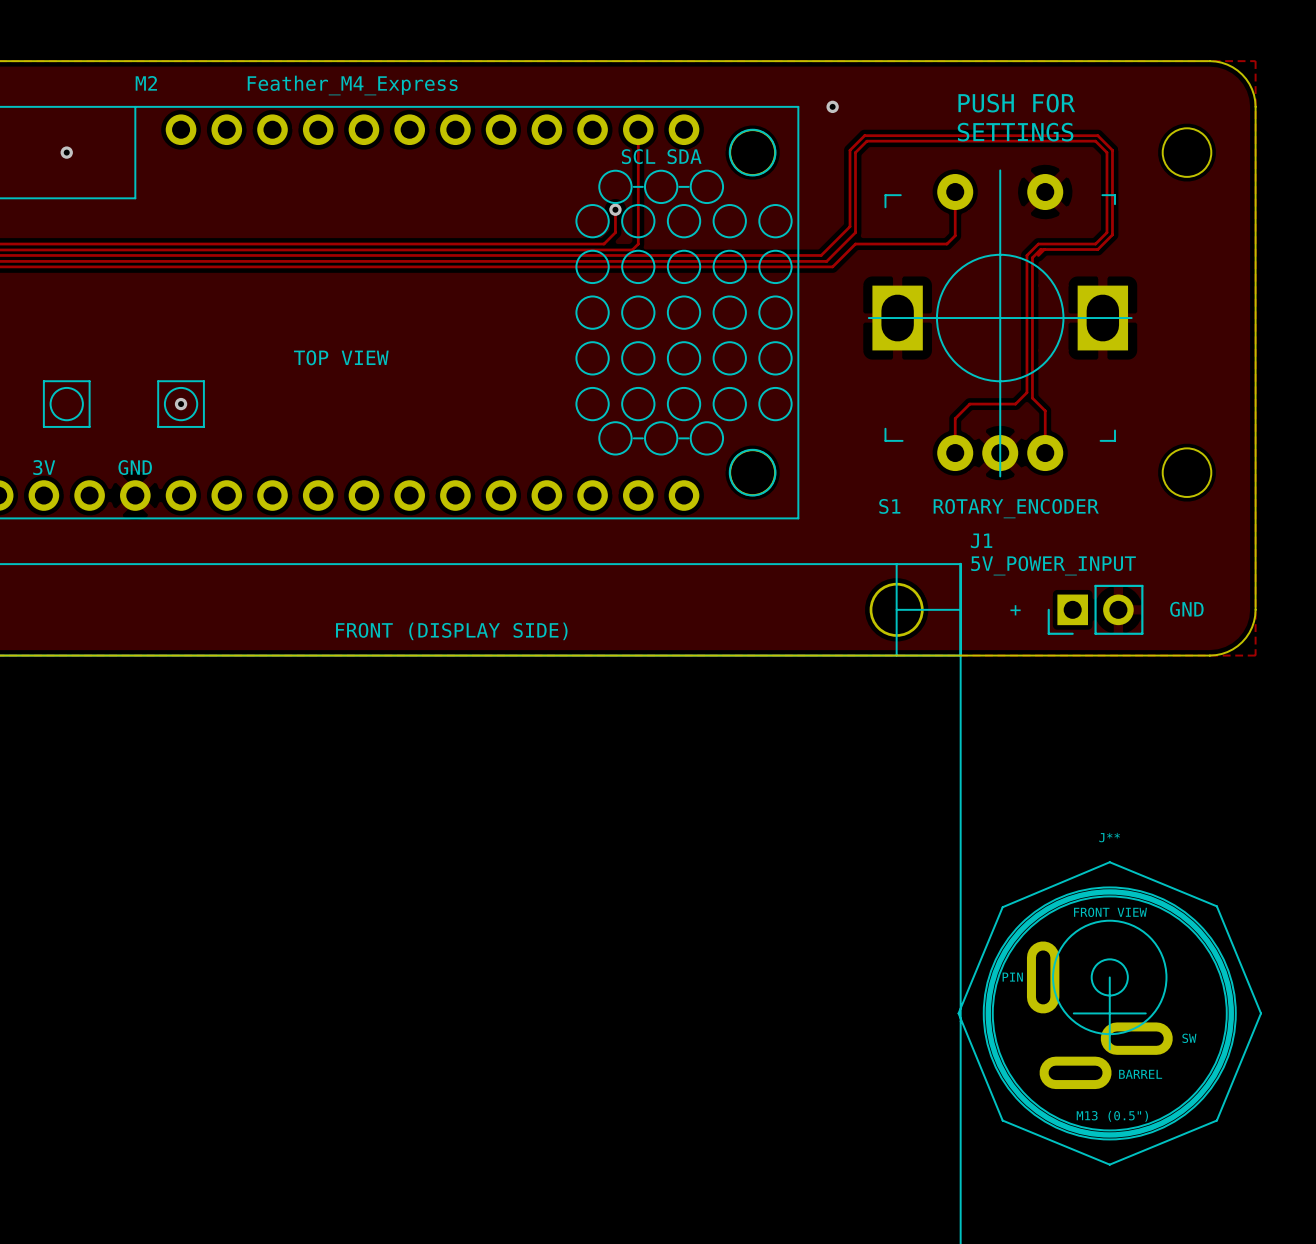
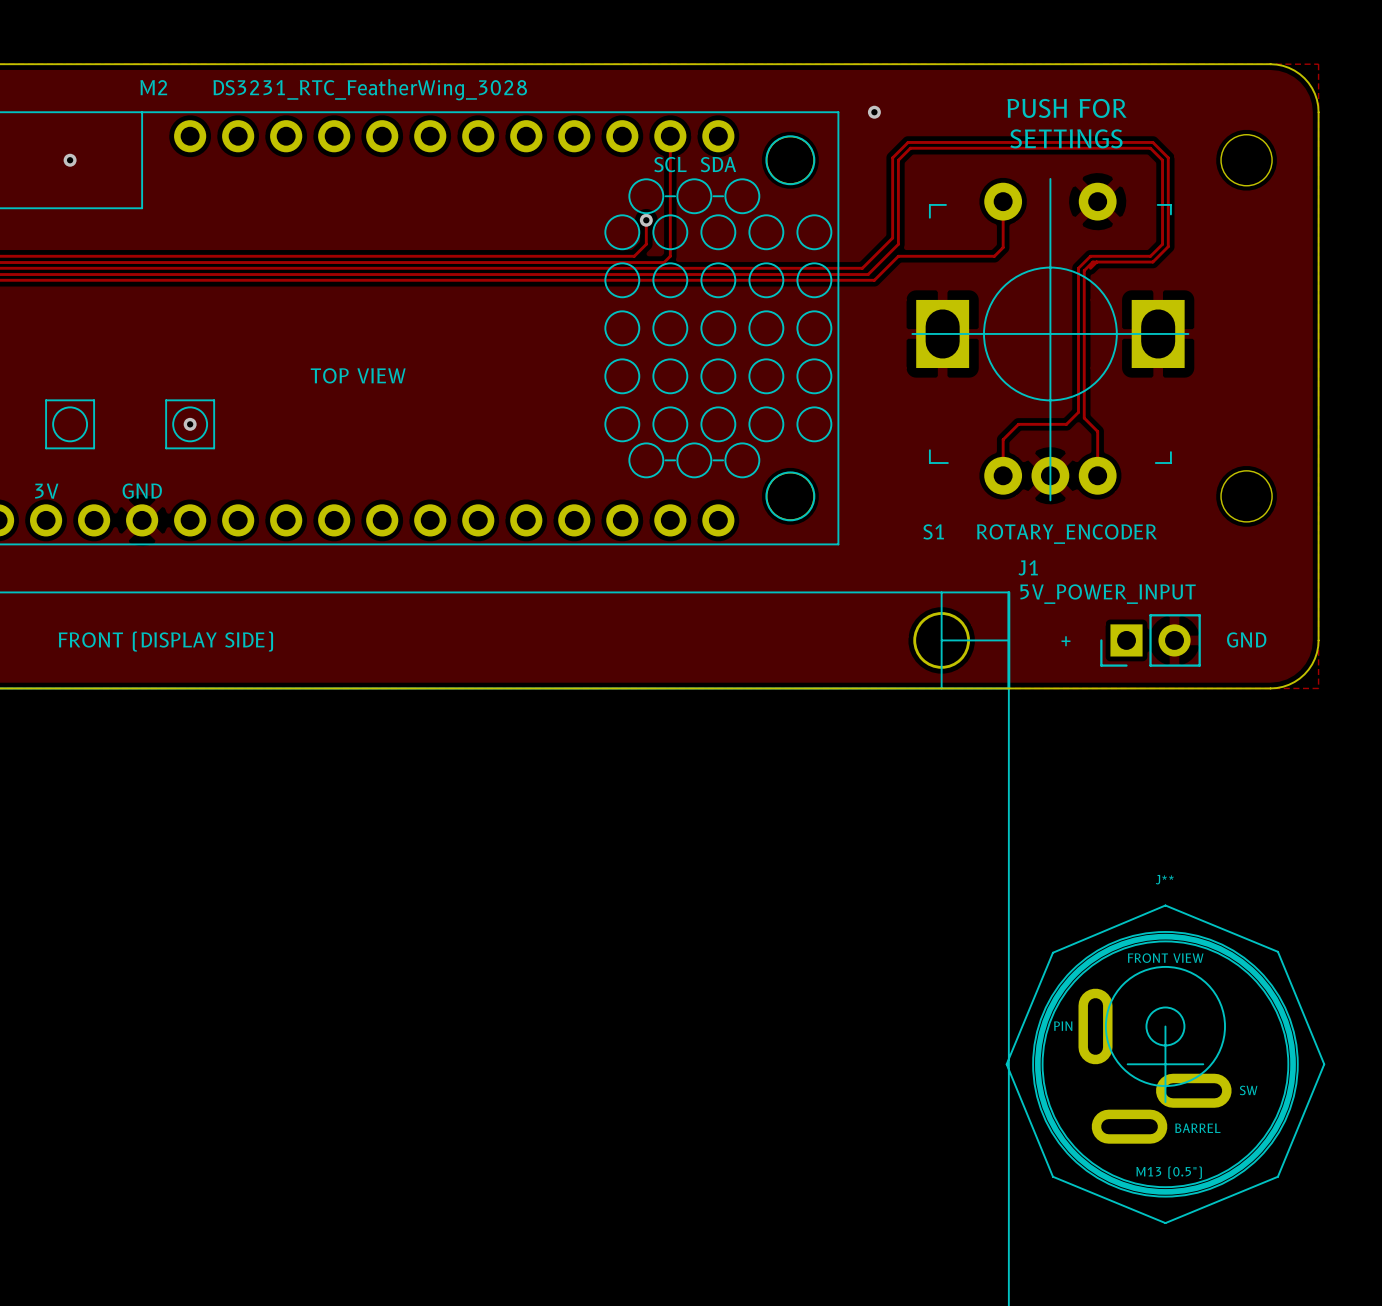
M2 value: Feather_M4_Express (352, 85) -> DS3231_RTC_FeatherWing_3028 (370, 89)
part text position: FRONT (DISPLAY SIDE) (451, 631) -> FRONT (DISPLAY SIDE) (165, 641)

